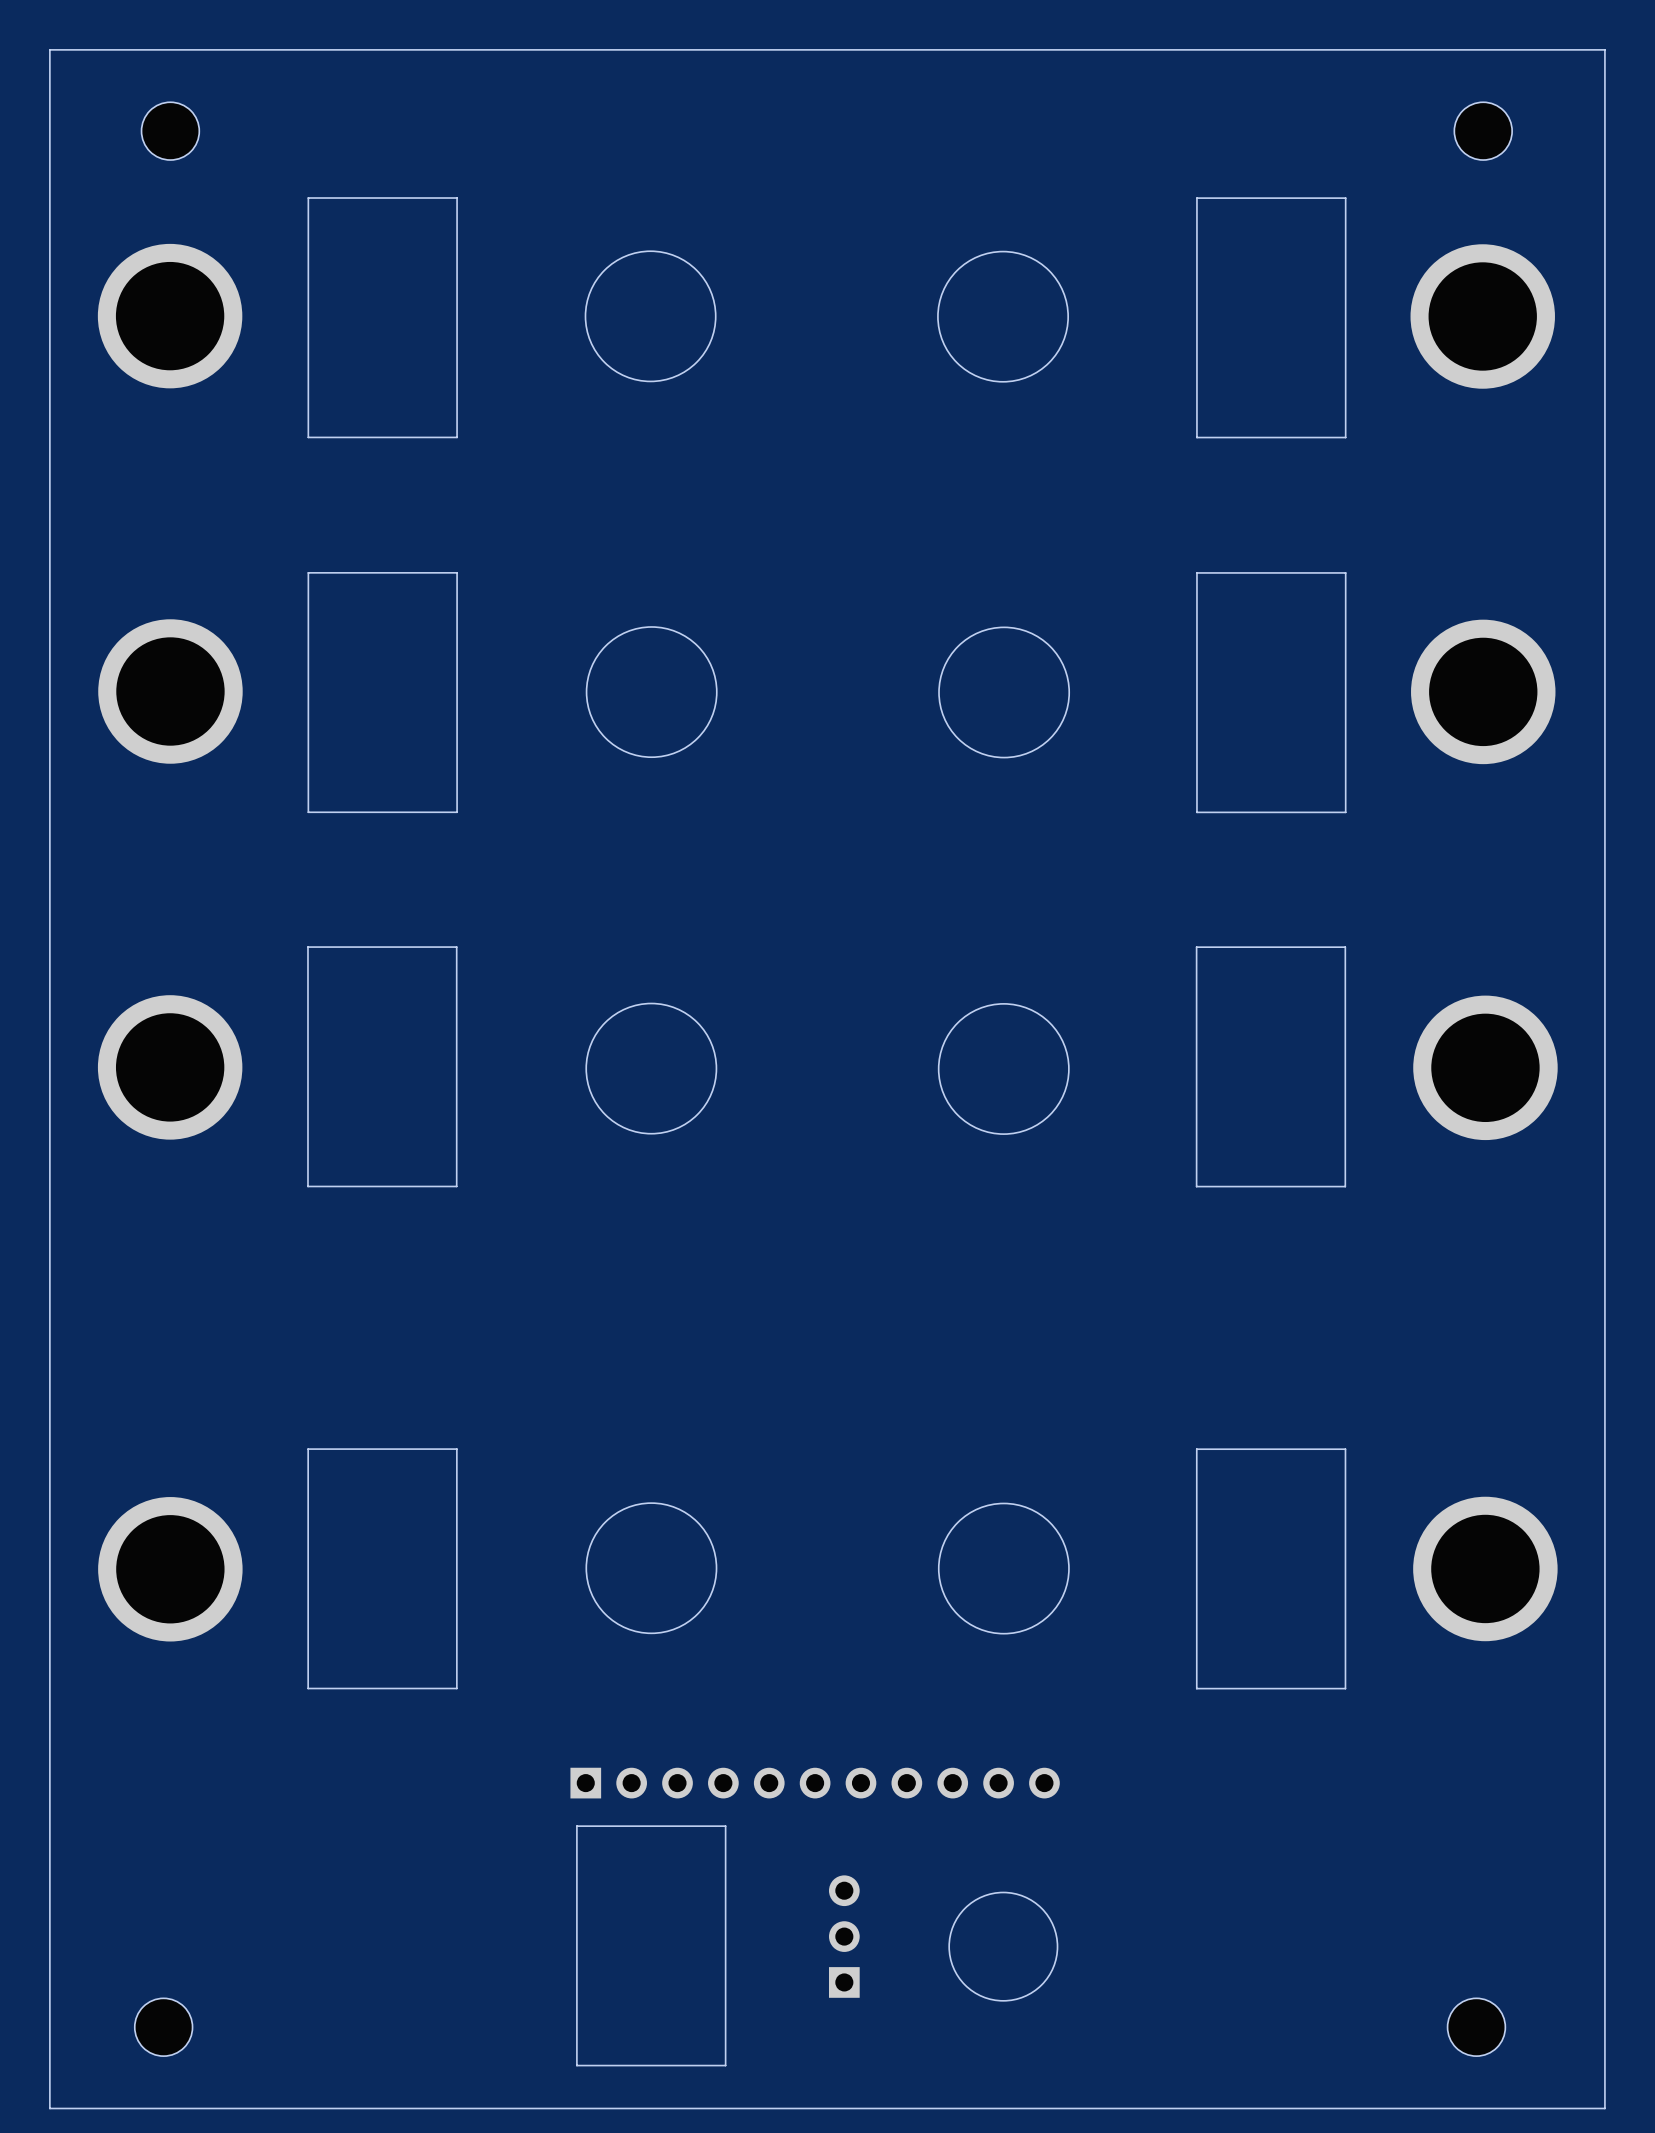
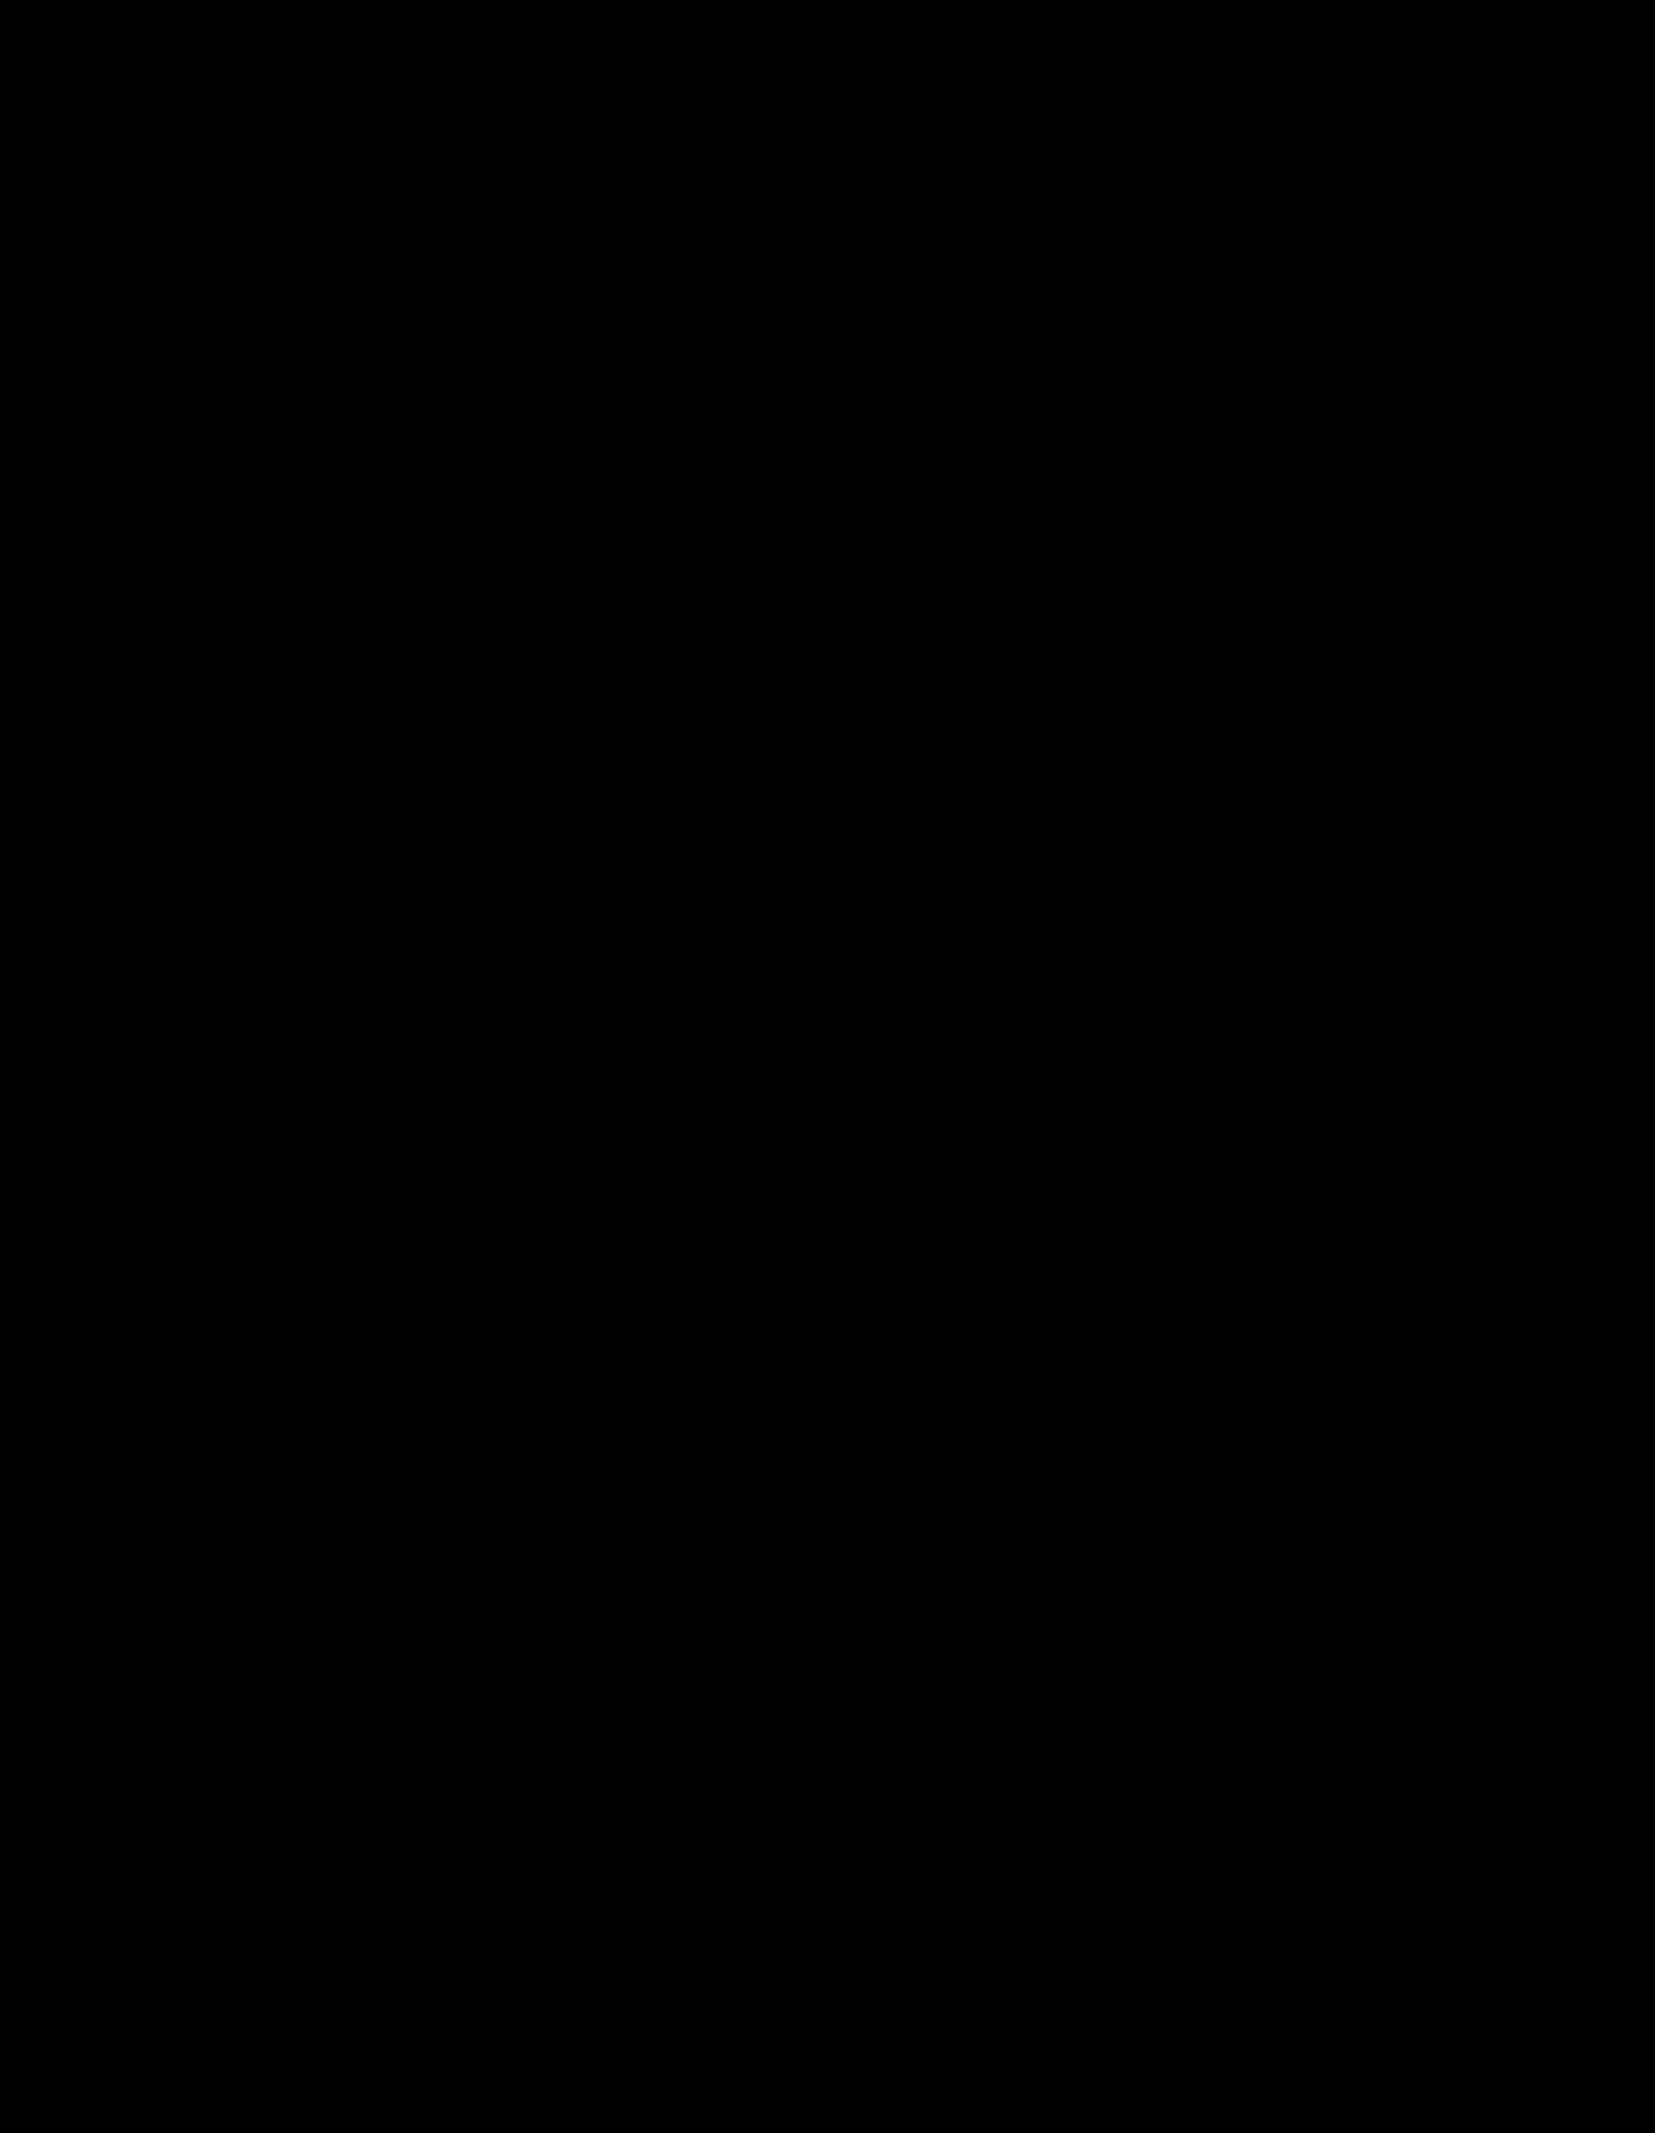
board edge: (1604, 49) (49, 49) (49, 2108) (1604, 2108) (1604, 49) -> none
part: (170, 131) -> none
part: (1483, 131) -> none
board edge: (457, 198) (457, 437) (308, 437) (308, 198) (457, 198) -> none
board edge: (1345, 198) (1196, 198) (1196, 437) (1345, 437) (1345, 198) -> none
round board edge: [585, 250, 717, 382] -> none
round board edge: [937, 251, 1069, 383] -> none
part: (170, 316) -> none
part: (1482, 316) -> none
board edge: (457, 572) (308, 572) (308, 812) (457, 812) (457, 572) -> none
board edge: (1345, 572) (1345, 812) (1196, 812) (1196, 572) (1345, 572) -> none
round board edge: [586, 626, 718, 758] -> none
round board edge: [938, 626, 1070, 759] -> none
part: (170, 691) -> none
part: (1483, 691) -> none
board edge: (456, 947) (307, 947) (307, 1186) (456, 1186) (456, 947) -> none
board edge: (1345, 947) (1196, 947) (1196, 1186) (1345, 1186) (1345, 947) -> none
round board edge: [585, 1003, 717, 1135] -> none
round board edge: [938, 1003, 1070, 1135] -> none
part: (170, 1067) -> none
part: (1485, 1067) -> none
board edge: (456, 1449) (308, 1449) (308, 1688) (456, 1688) (456, 1449) -> none
board edge: (1345, 1449) (1196, 1449) (1196, 1688) (1345, 1688) (1345, 1449) -> none
round board edge: [585, 1502, 717, 1634] -> none
round board edge: [938, 1503, 1070, 1635] -> none
part: (1485, 1568) -> none
part: (170, 1569) -> none
part: (815, 1783) -> none
board edge: (725, 1826) (576, 1826) (576, 2065) (725, 2065) (725, 1826) -> none
round board edge: [948, 1892, 1058, 2002] -> none
part: (844, 1936) -> none
part: (163, 2027) -> none
part: (1476, 2027) -> none

